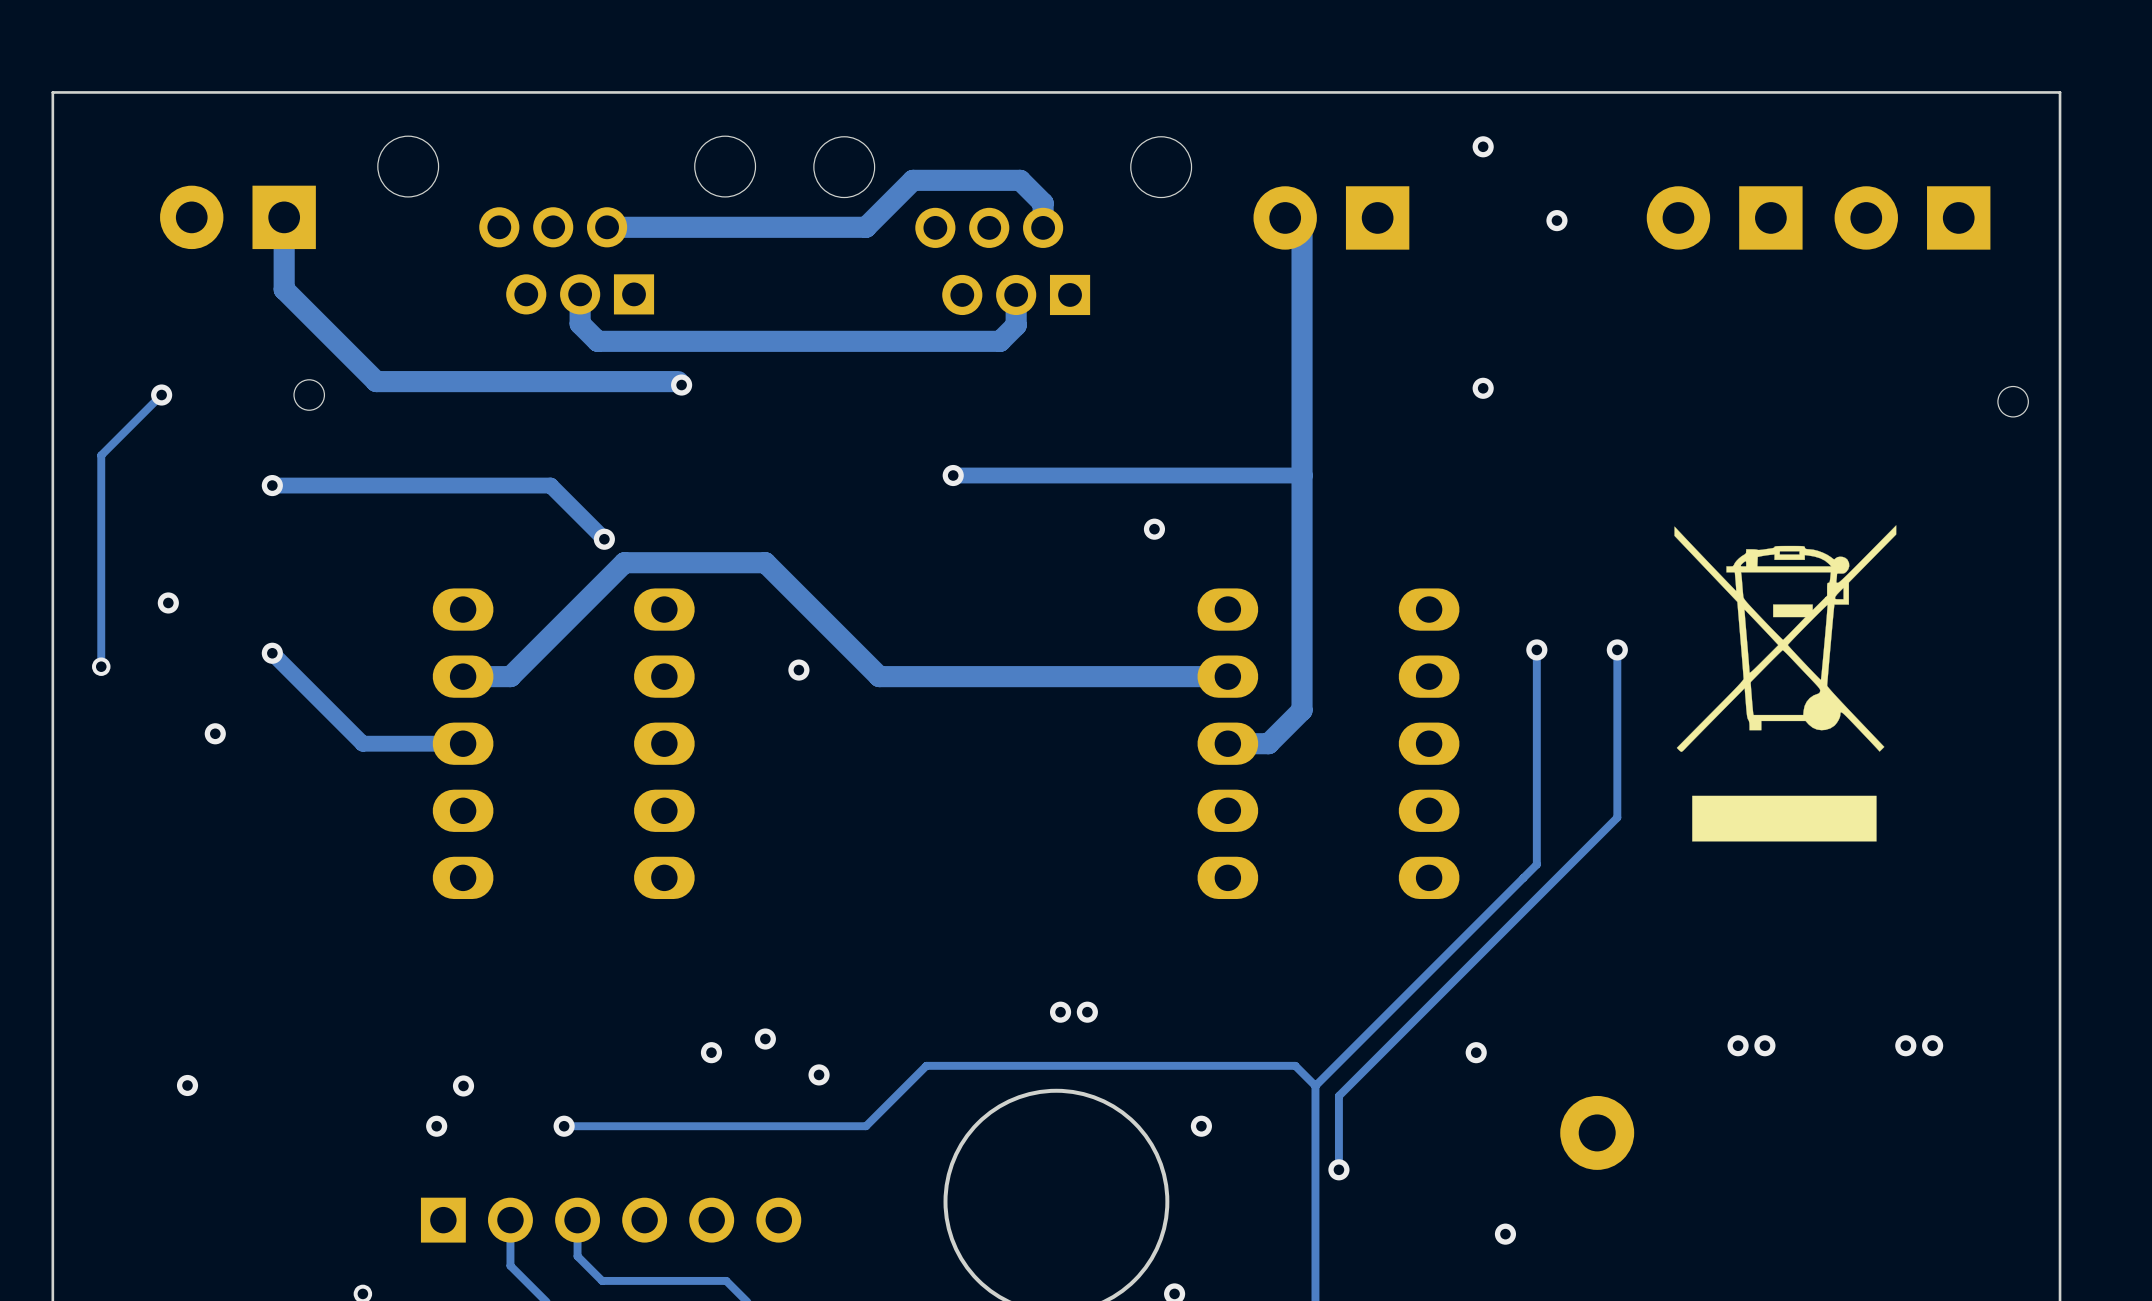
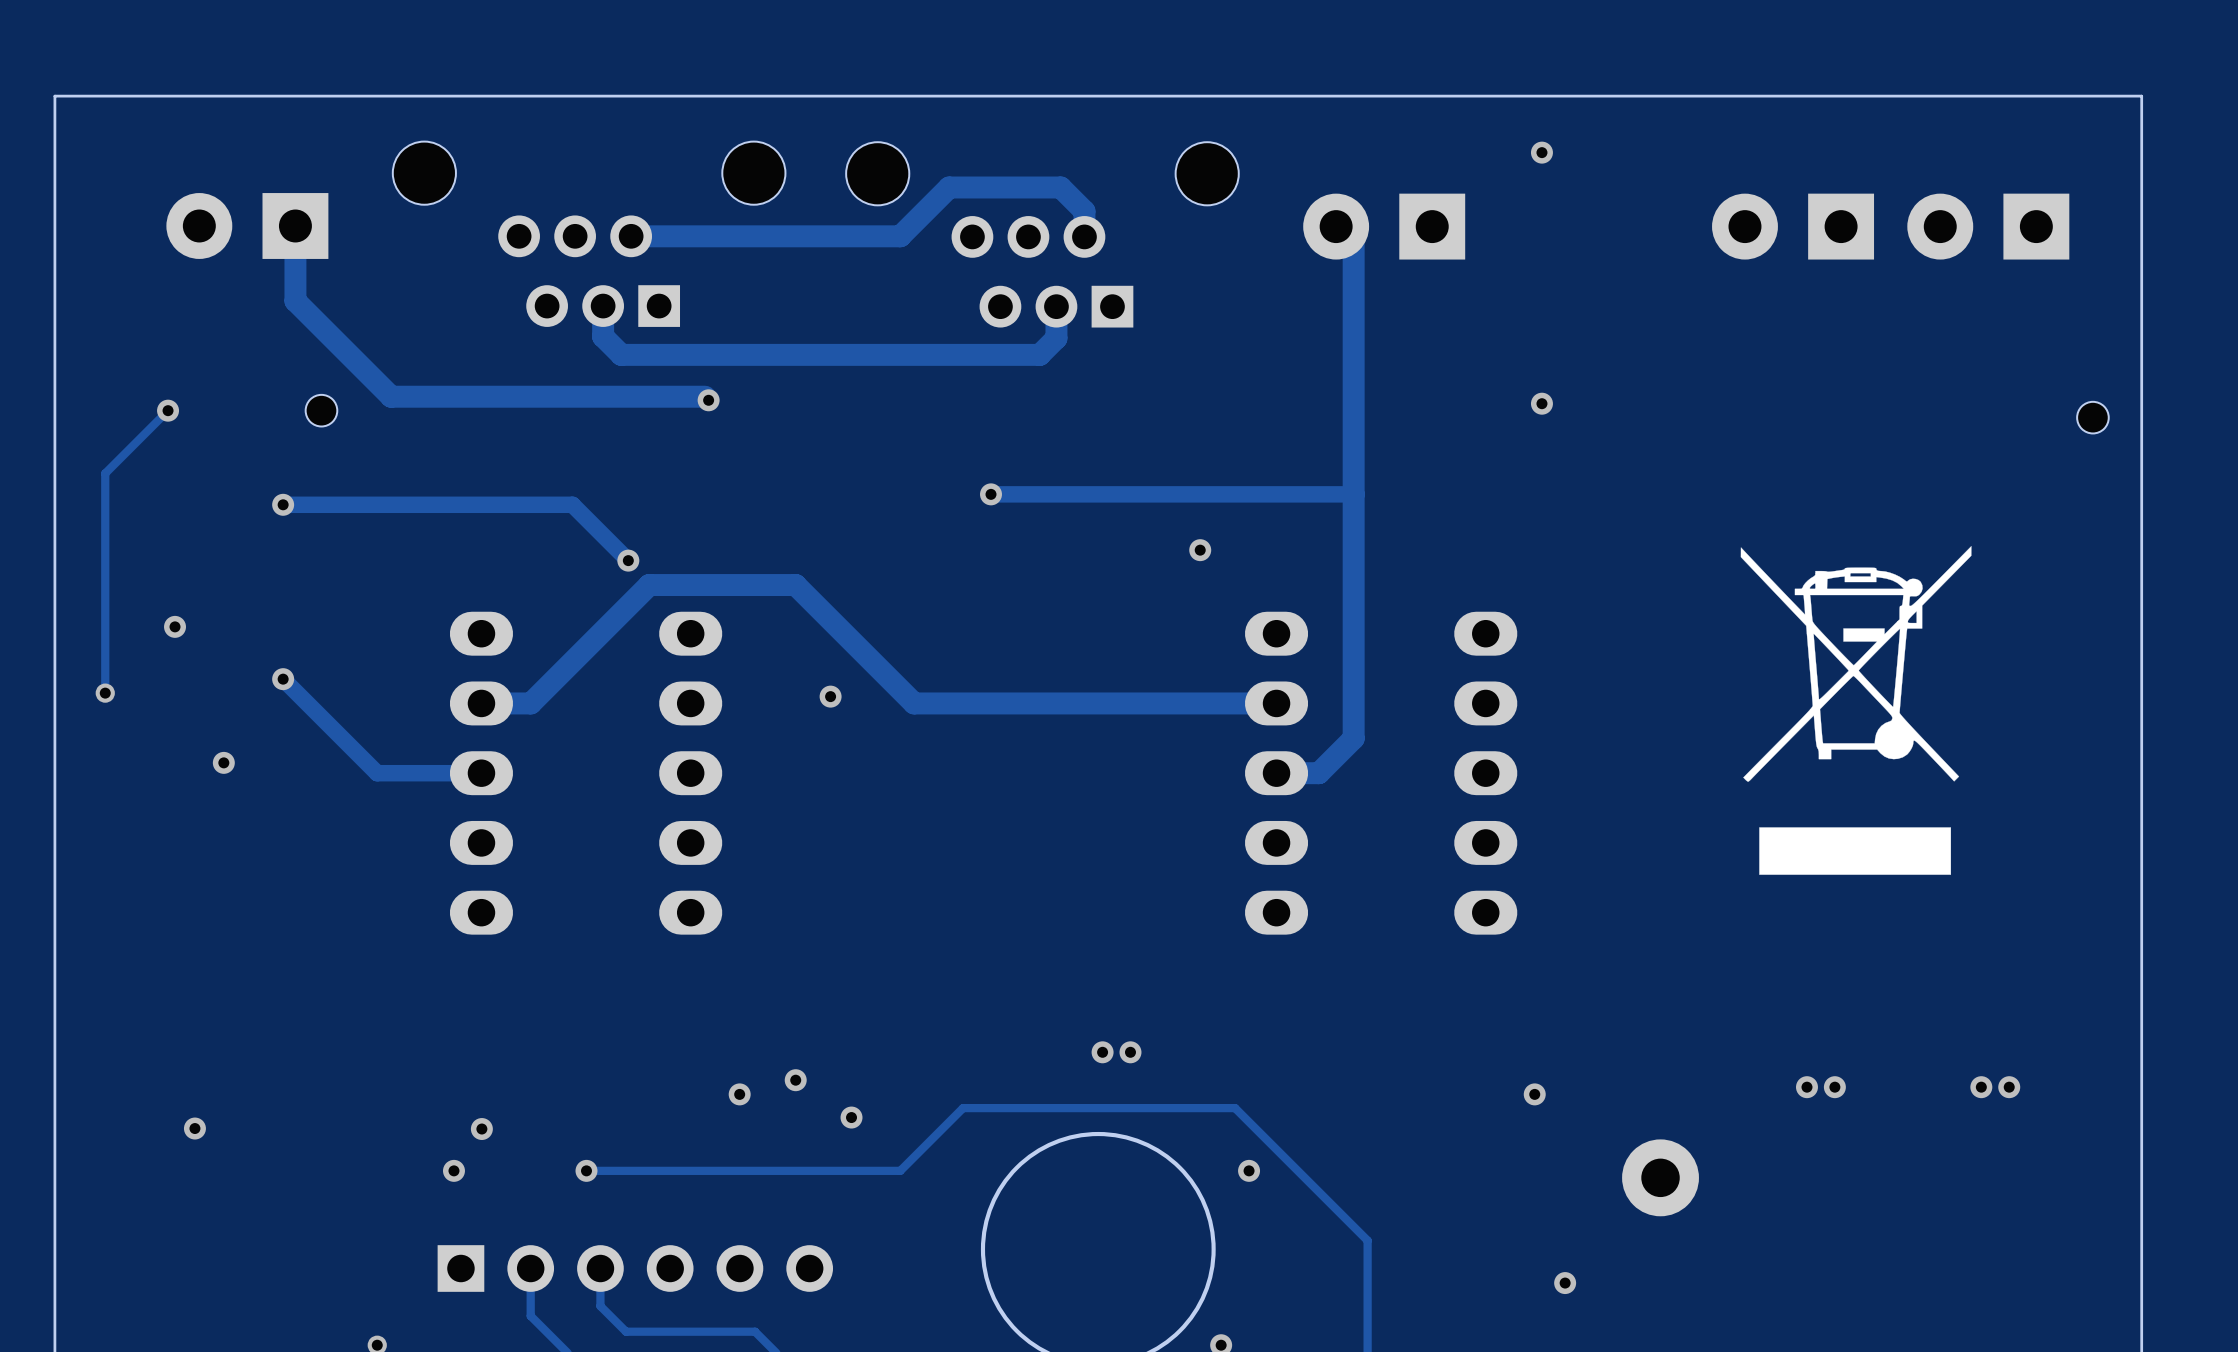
via: (1556, 220) -> none
track: (1536, 649) (1536, 864) (1315, 1085) -> none
via: (1536, 649) -> none
track: (1617, 649) (1617, 817) (1338, 1096) (1338, 1169) -> none
via: (1617, 649) -> none
track: (1188, 1065) (1295, 1065) (1315, 1085) -> (1235, 1108) (1367, 1240)
track: (1315, 1085) (1315, 1193) -> none
via: (1338, 1169) -> none

